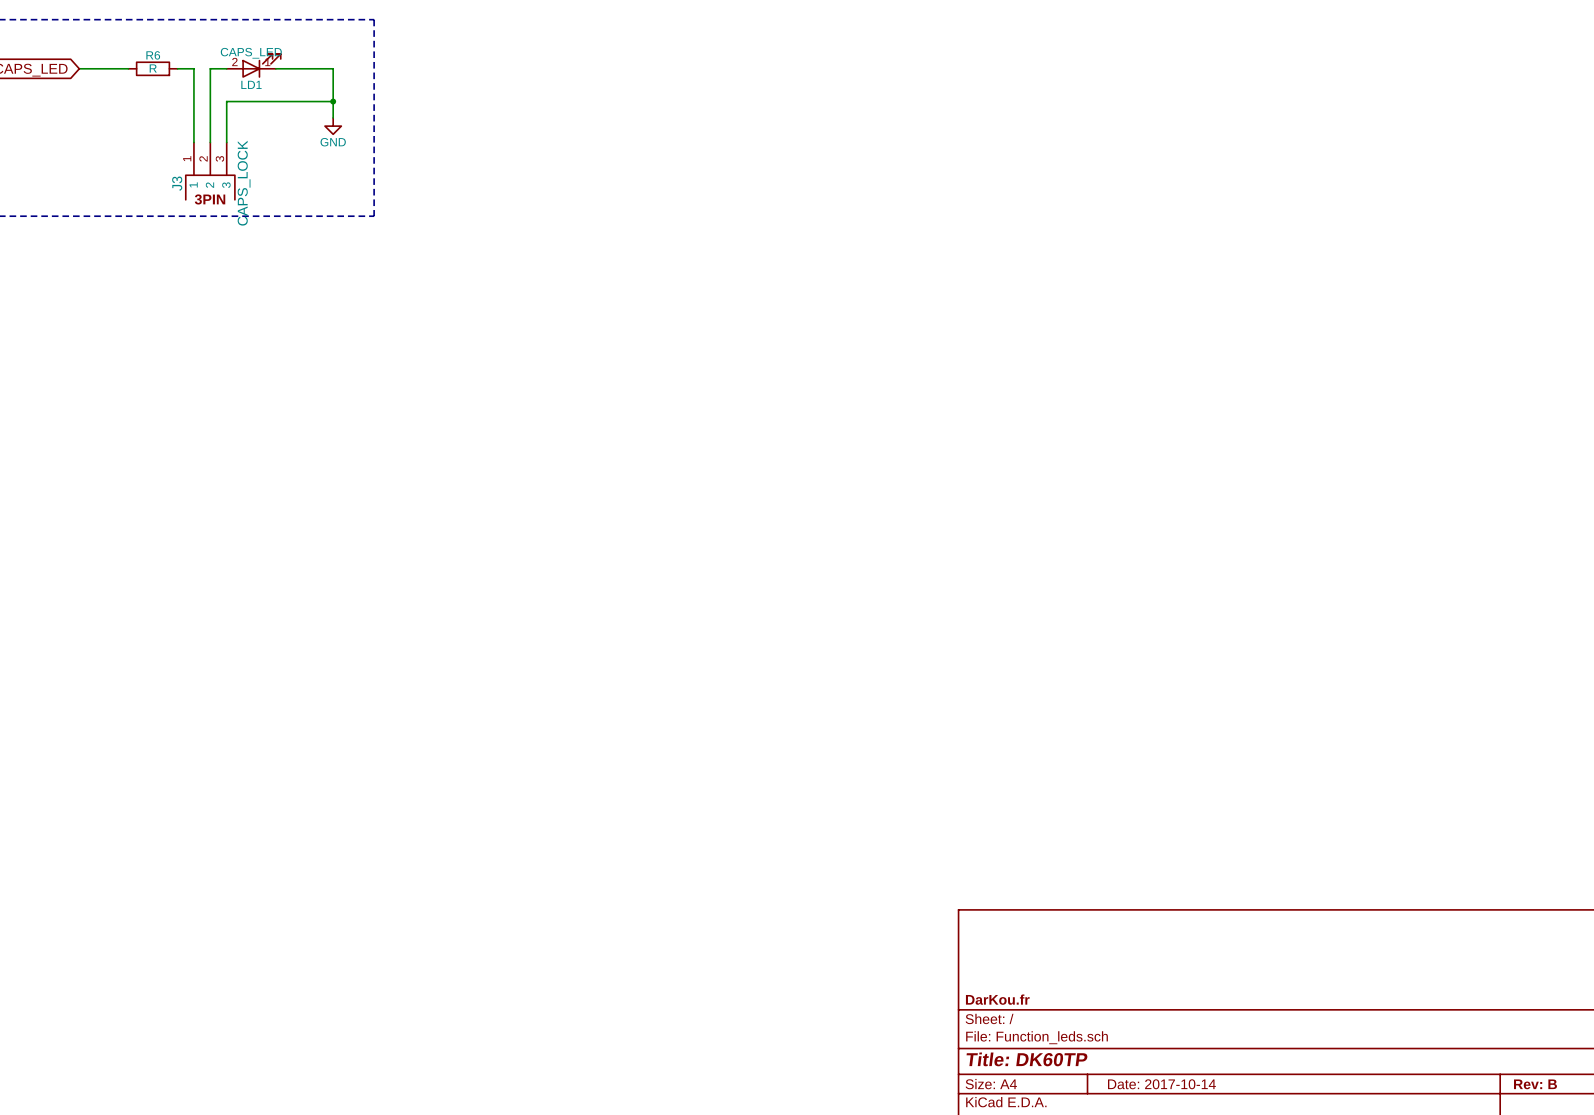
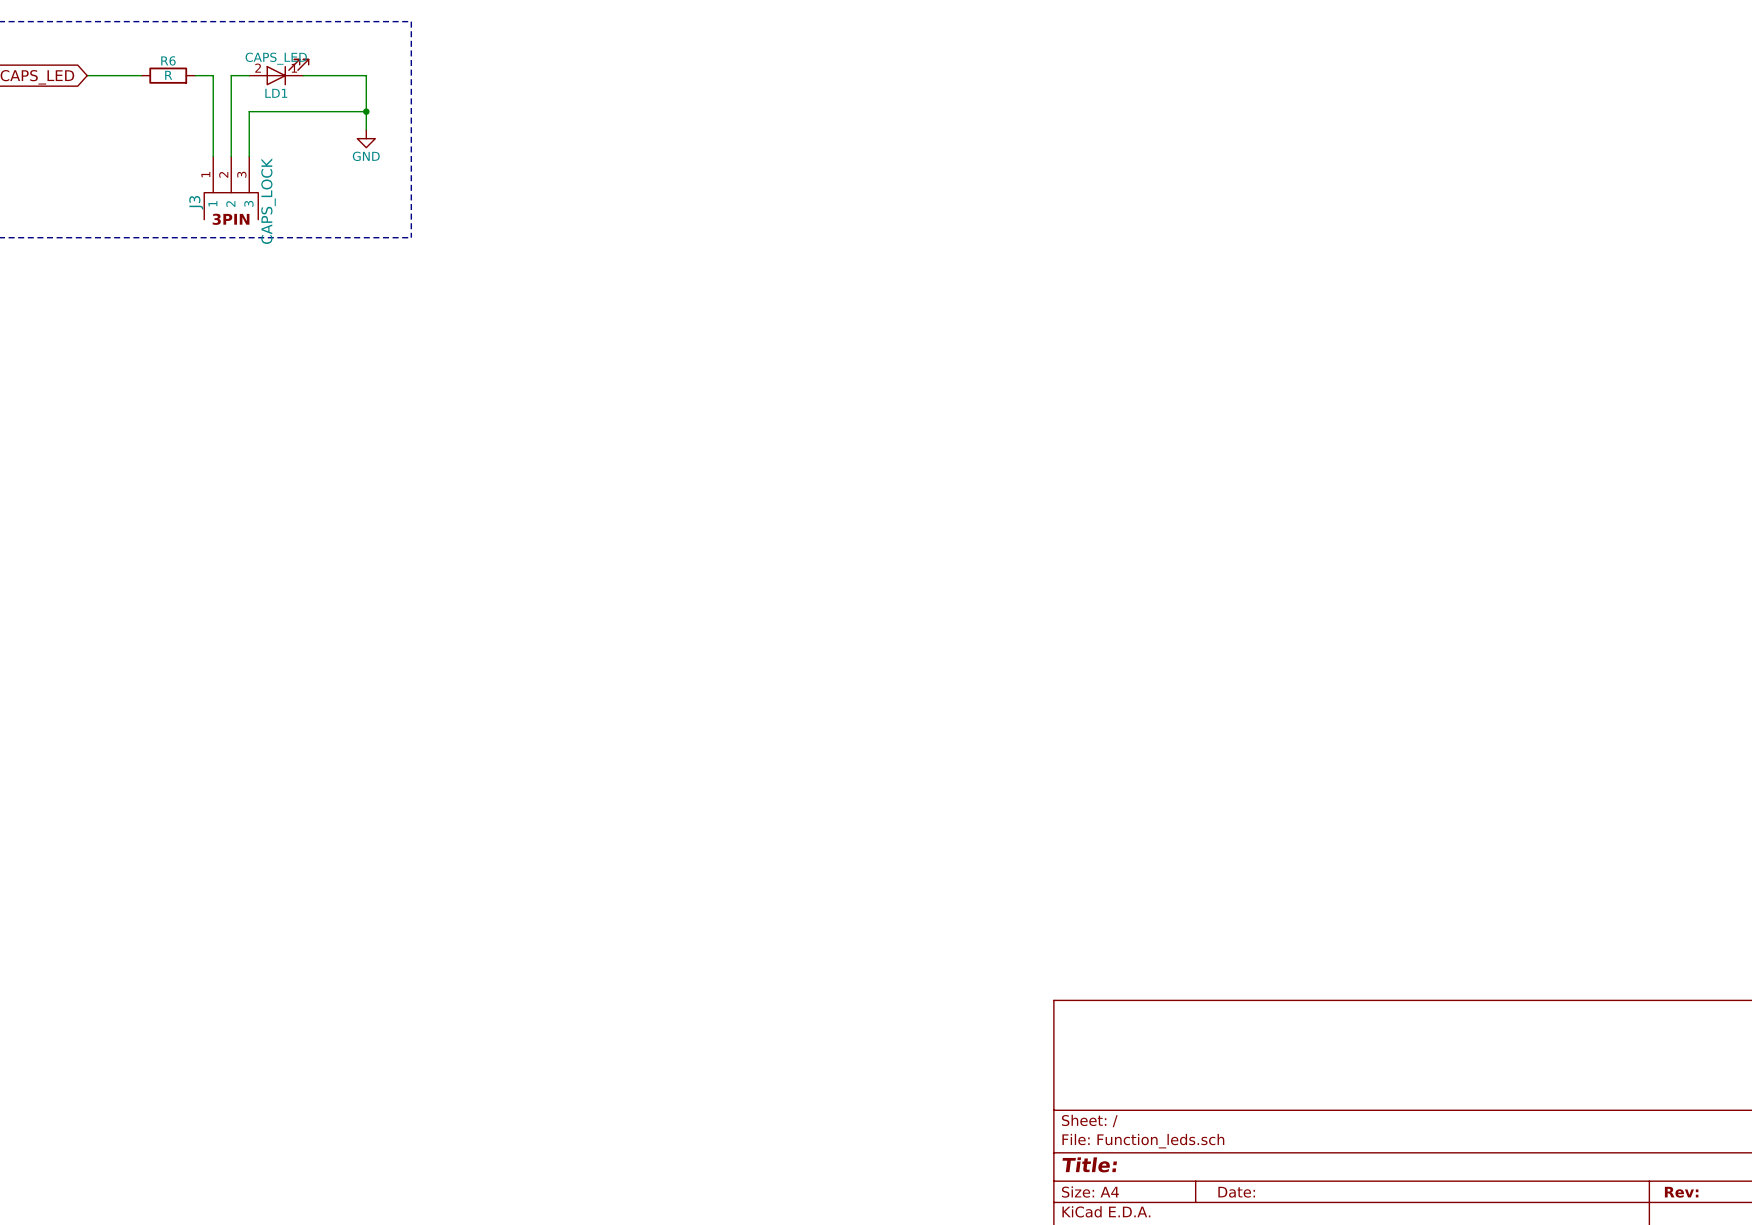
title block: DarKou.fr (997, 999) -> none
title block: Title: DK60TP (1027, 1059) -> Title: (1089, 1164)
title block: Date: 2017-10-14 (1161, 1084) -> Date: (1236, 1192)
title block: Rev: B (1535, 1084) -> Rev: (1681, 1192)

